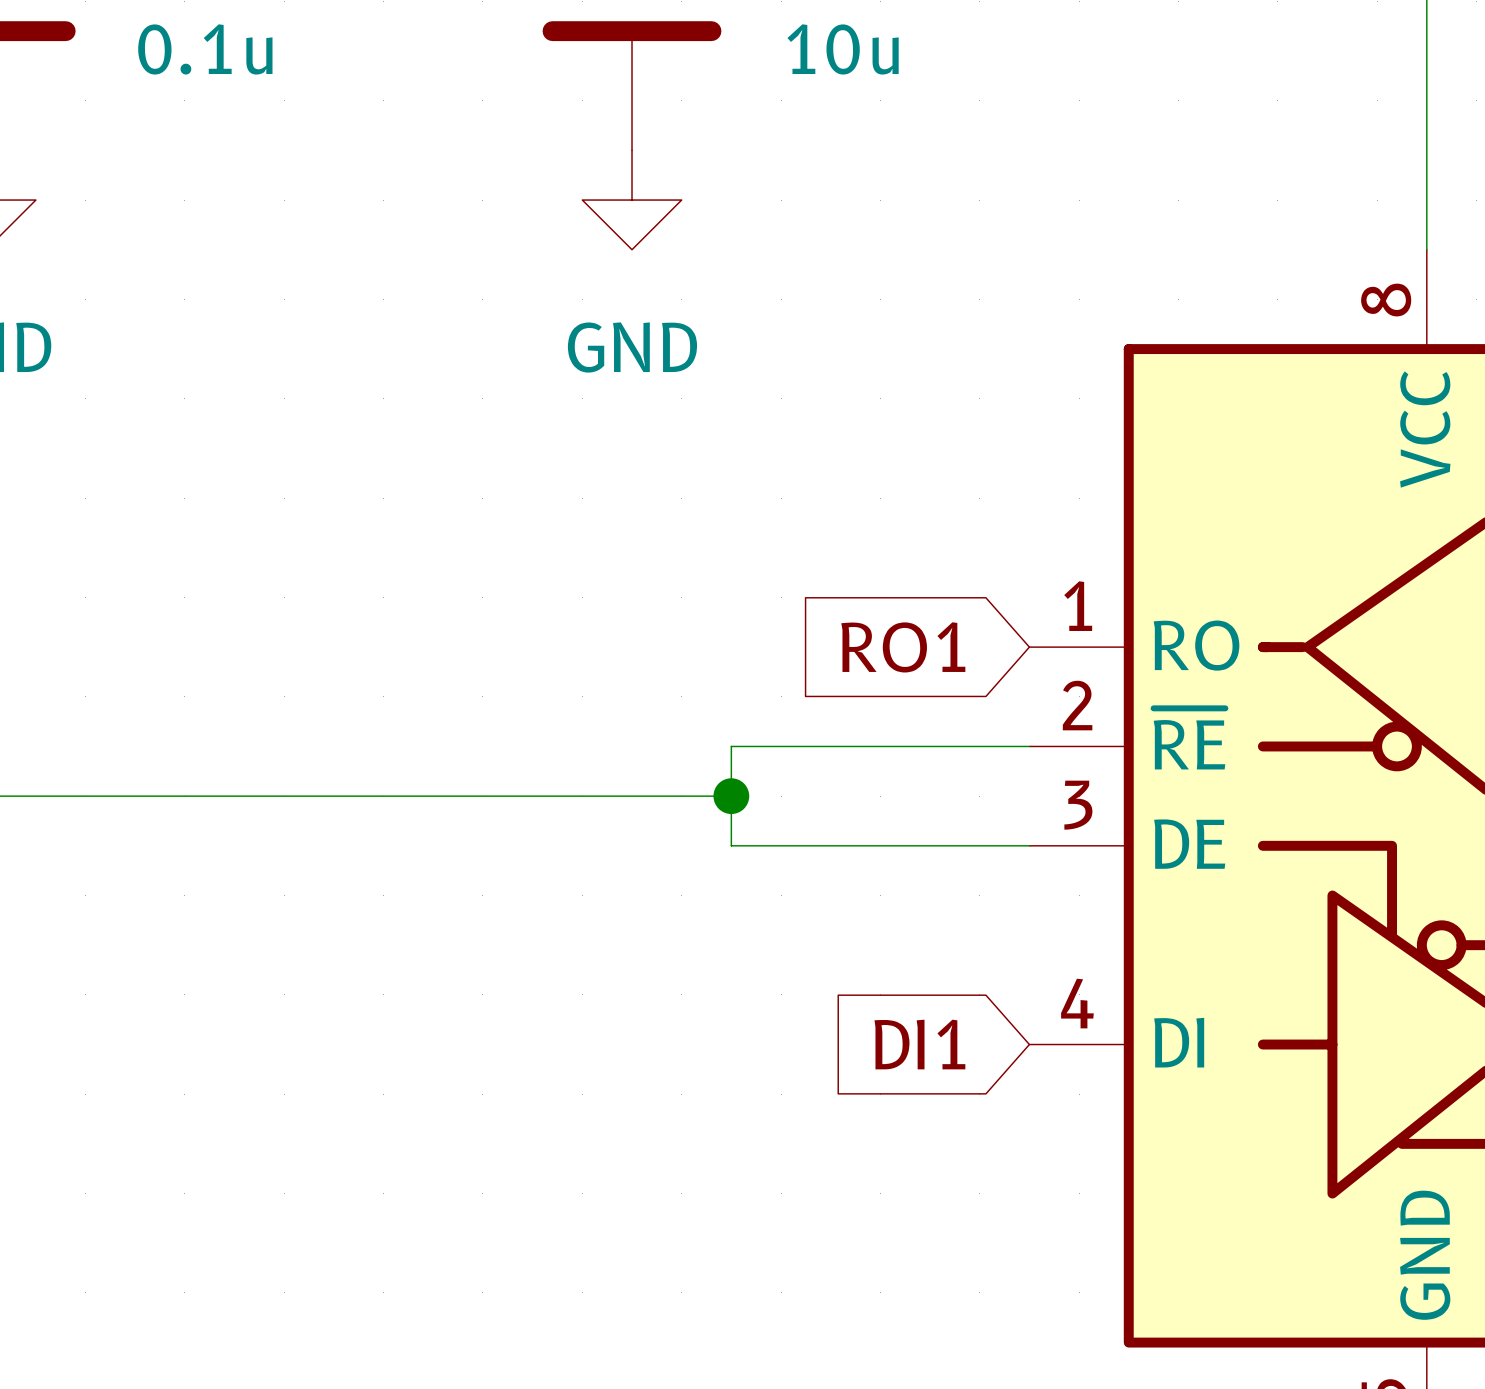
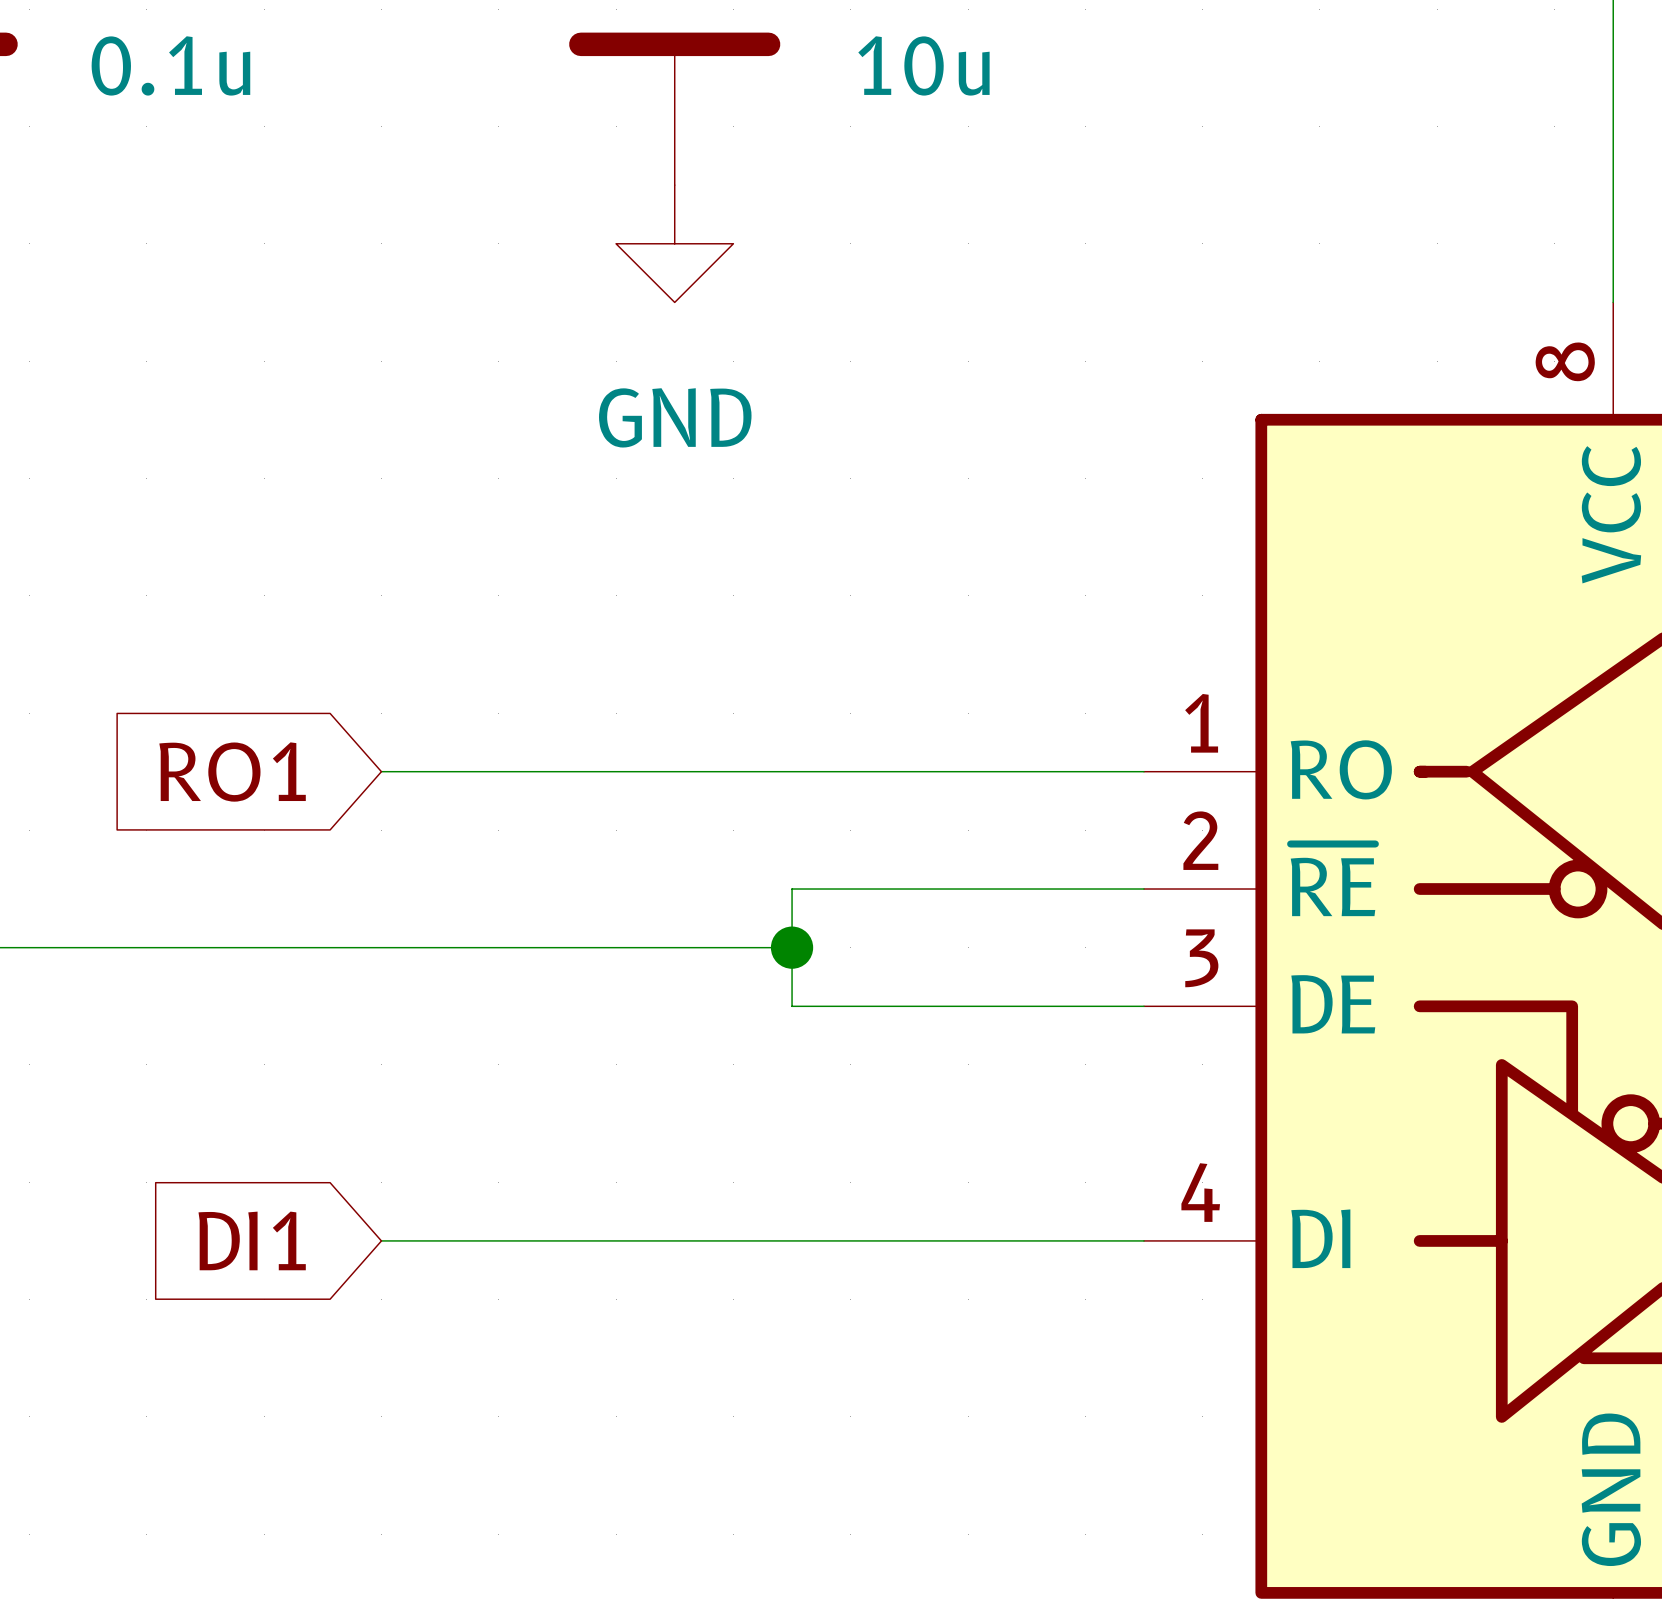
wire: none -> (381, 771) (1143, 771)
global label position: RO1 (903, 647) -> RO1 (232, 772)
wire: none -> (381, 1240) (1143, 1240)
global label position: DI1 (919, 1044) -> DI1 (252, 1240)

